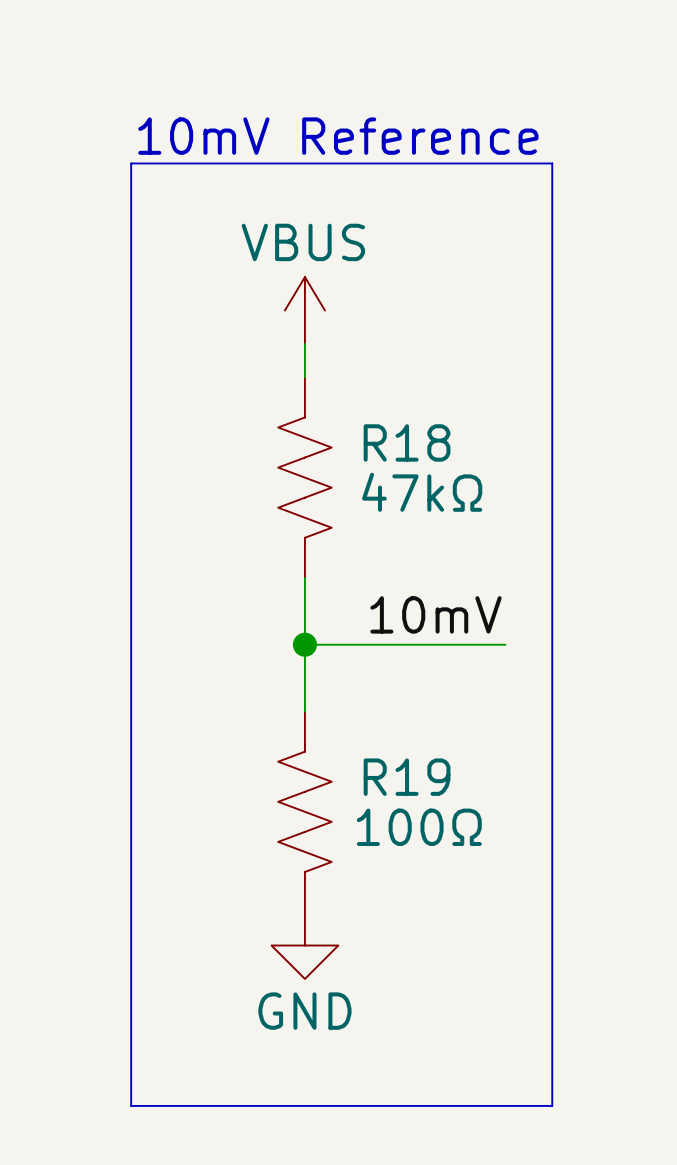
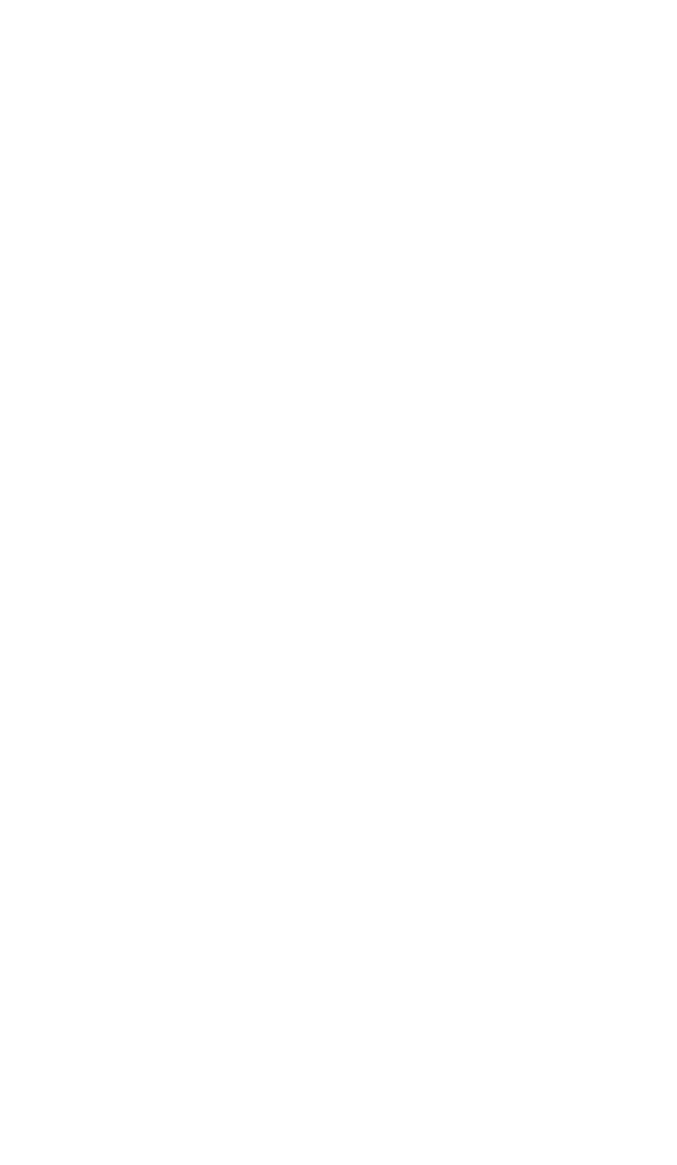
text: 10mV Reference (338, 136) -> none
line: (131, 163) (552, 163) (552, 1105) (131, 1105) (131, 163) -> none
power symbol: VBUS (304, 310) -> none
wire: (304, 343) (304, 377) -> none
R18: 47kΩ (304, 477) -> none
wire: (304, 577) (304, 711) -> none
label: 10mV (435, 614) -> none
wire: (304, 644) (505, 644) -> none
junction: (304, 644) -> none
R19: 100Ω (304, 811) -> none
power symbol: GND (304, 945) -> none

